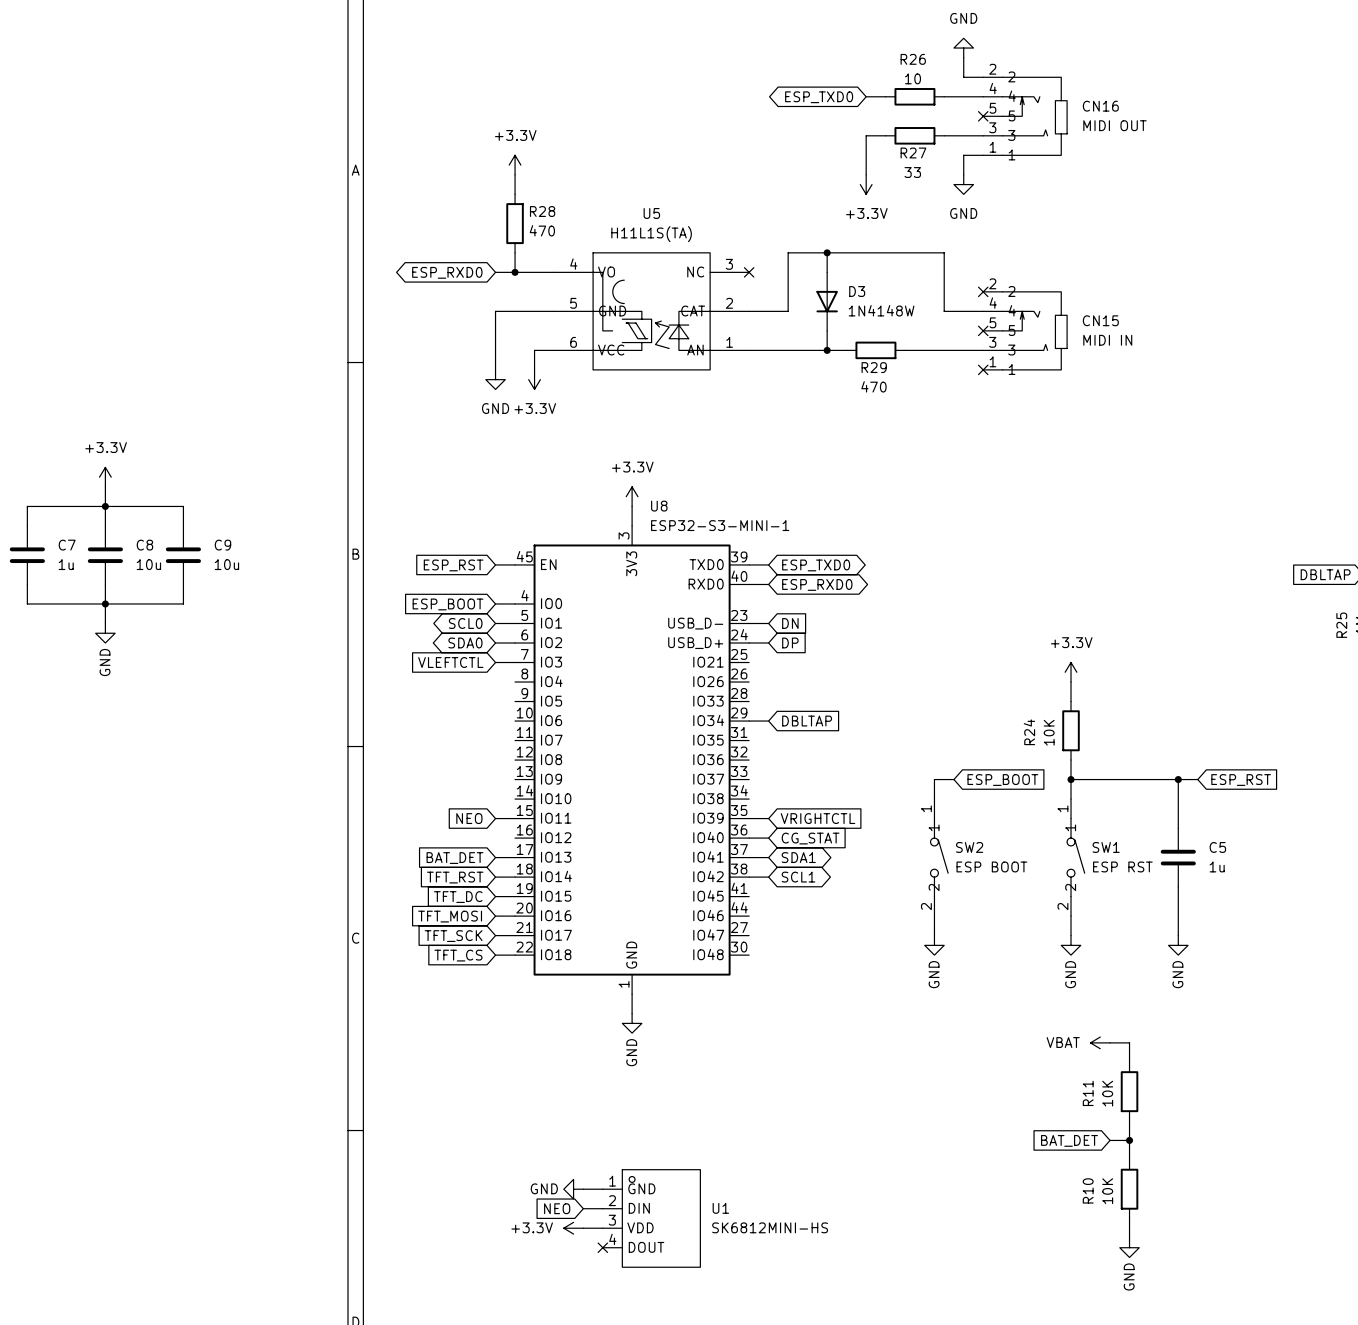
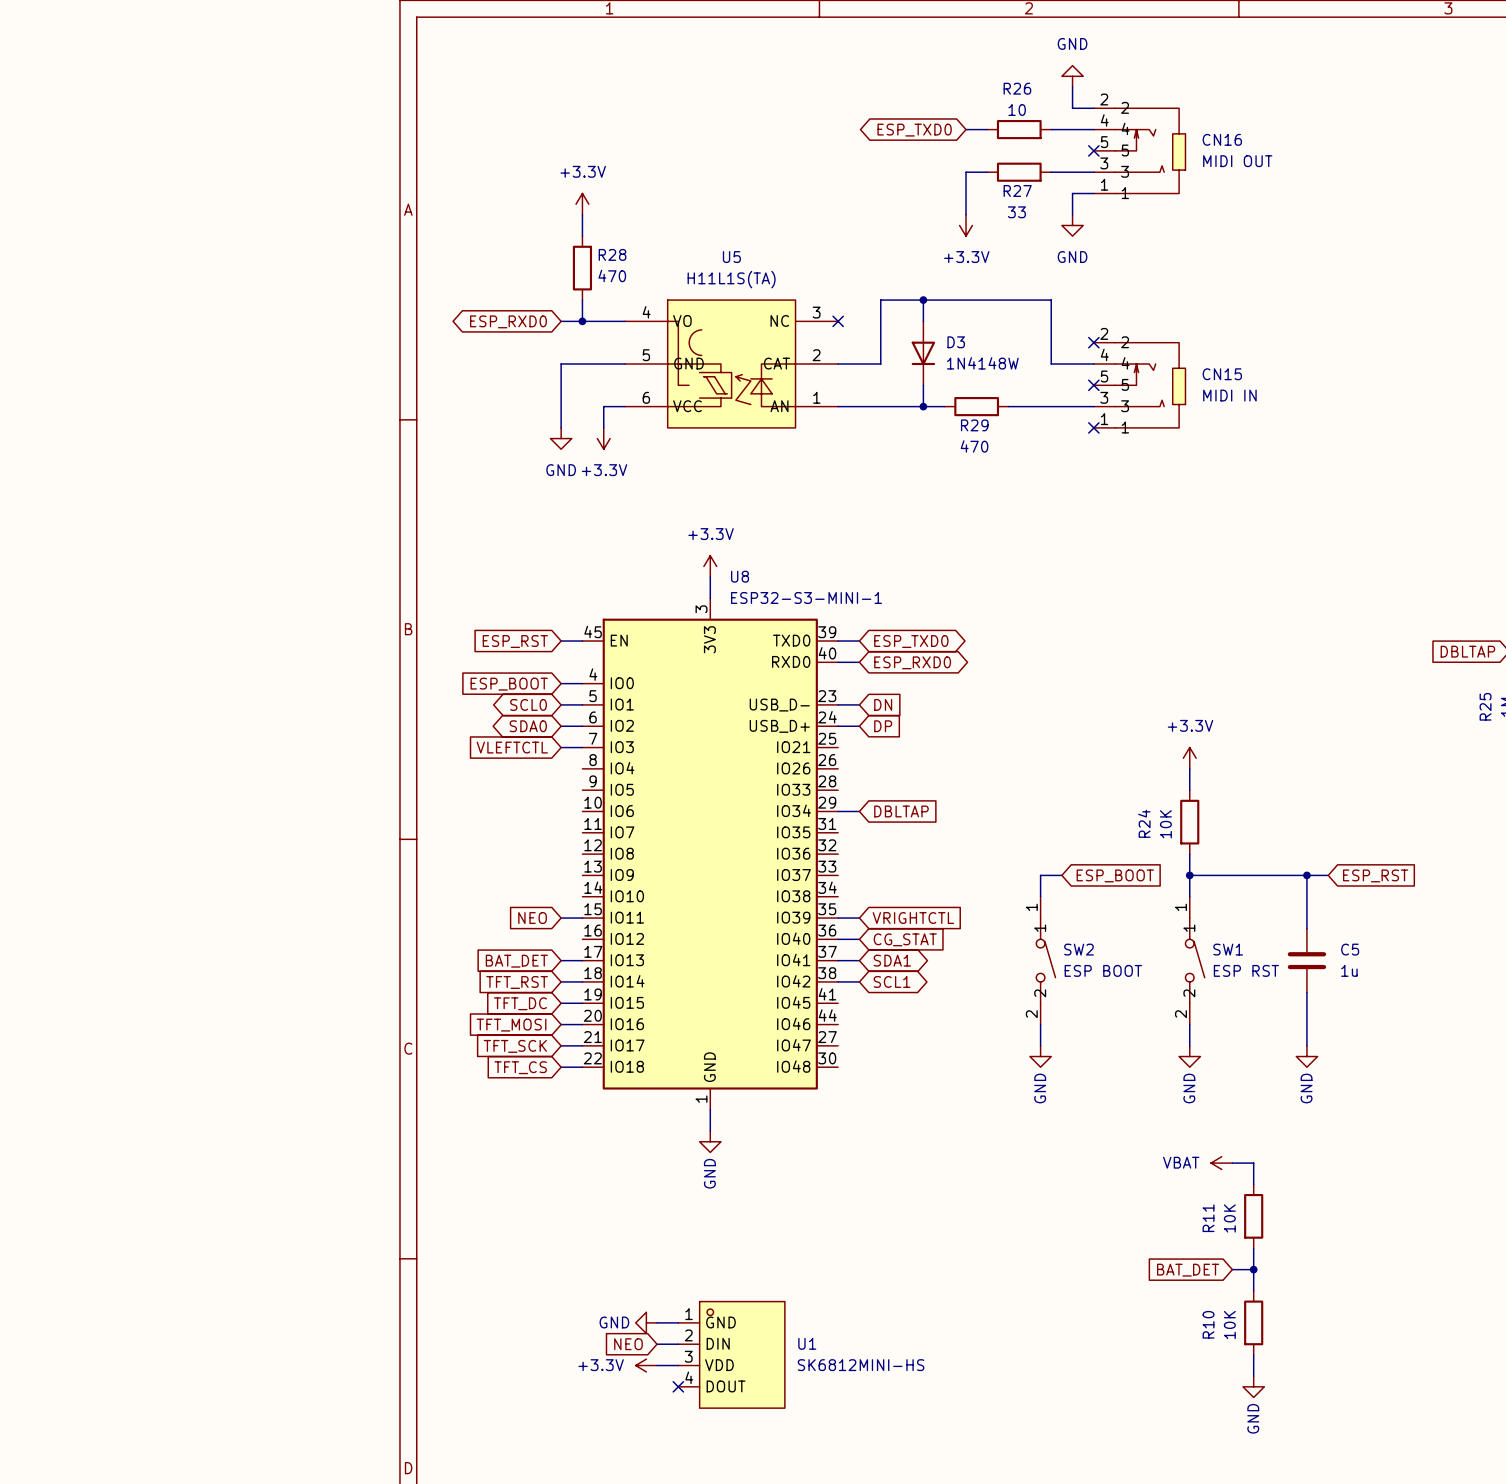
power symbol: +3.3V (105, 477) -> none
wire: (105, 486) (105, 525) -> none
junction: (105, 506) -> none
wire: (27, 525) (27, 506) (183, 506) (183, 525) -> none
C7: 1u (27, 555) -> none
C8: 10u (105, 555) -> none
C9: 10u (183, 555) -> none
wire: (27, 584) (27, 603) (183, 603) (183, 584) -> none
wire: (105, 584) (105, 623) -> none
junction: (105, 603) -> none
power symbol: GND (105, 633) -> none

